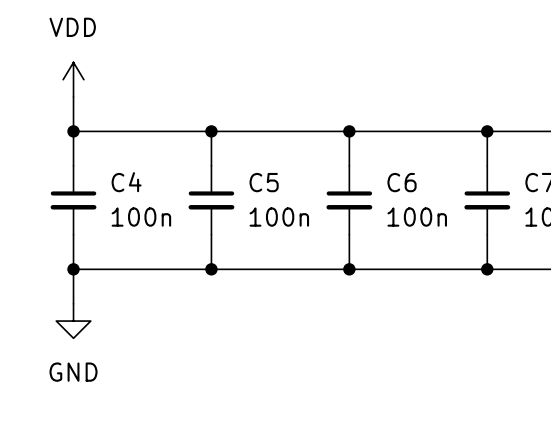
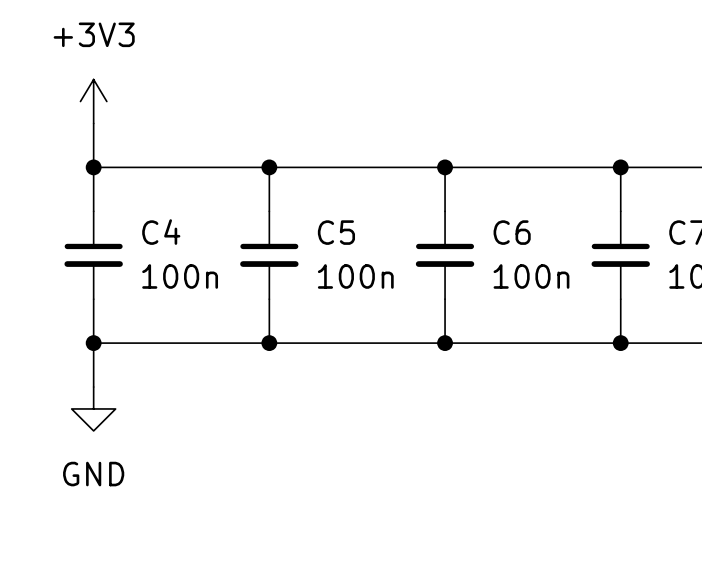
power symbol: VDD (73, 79) -> +3V3 (93, 101)

